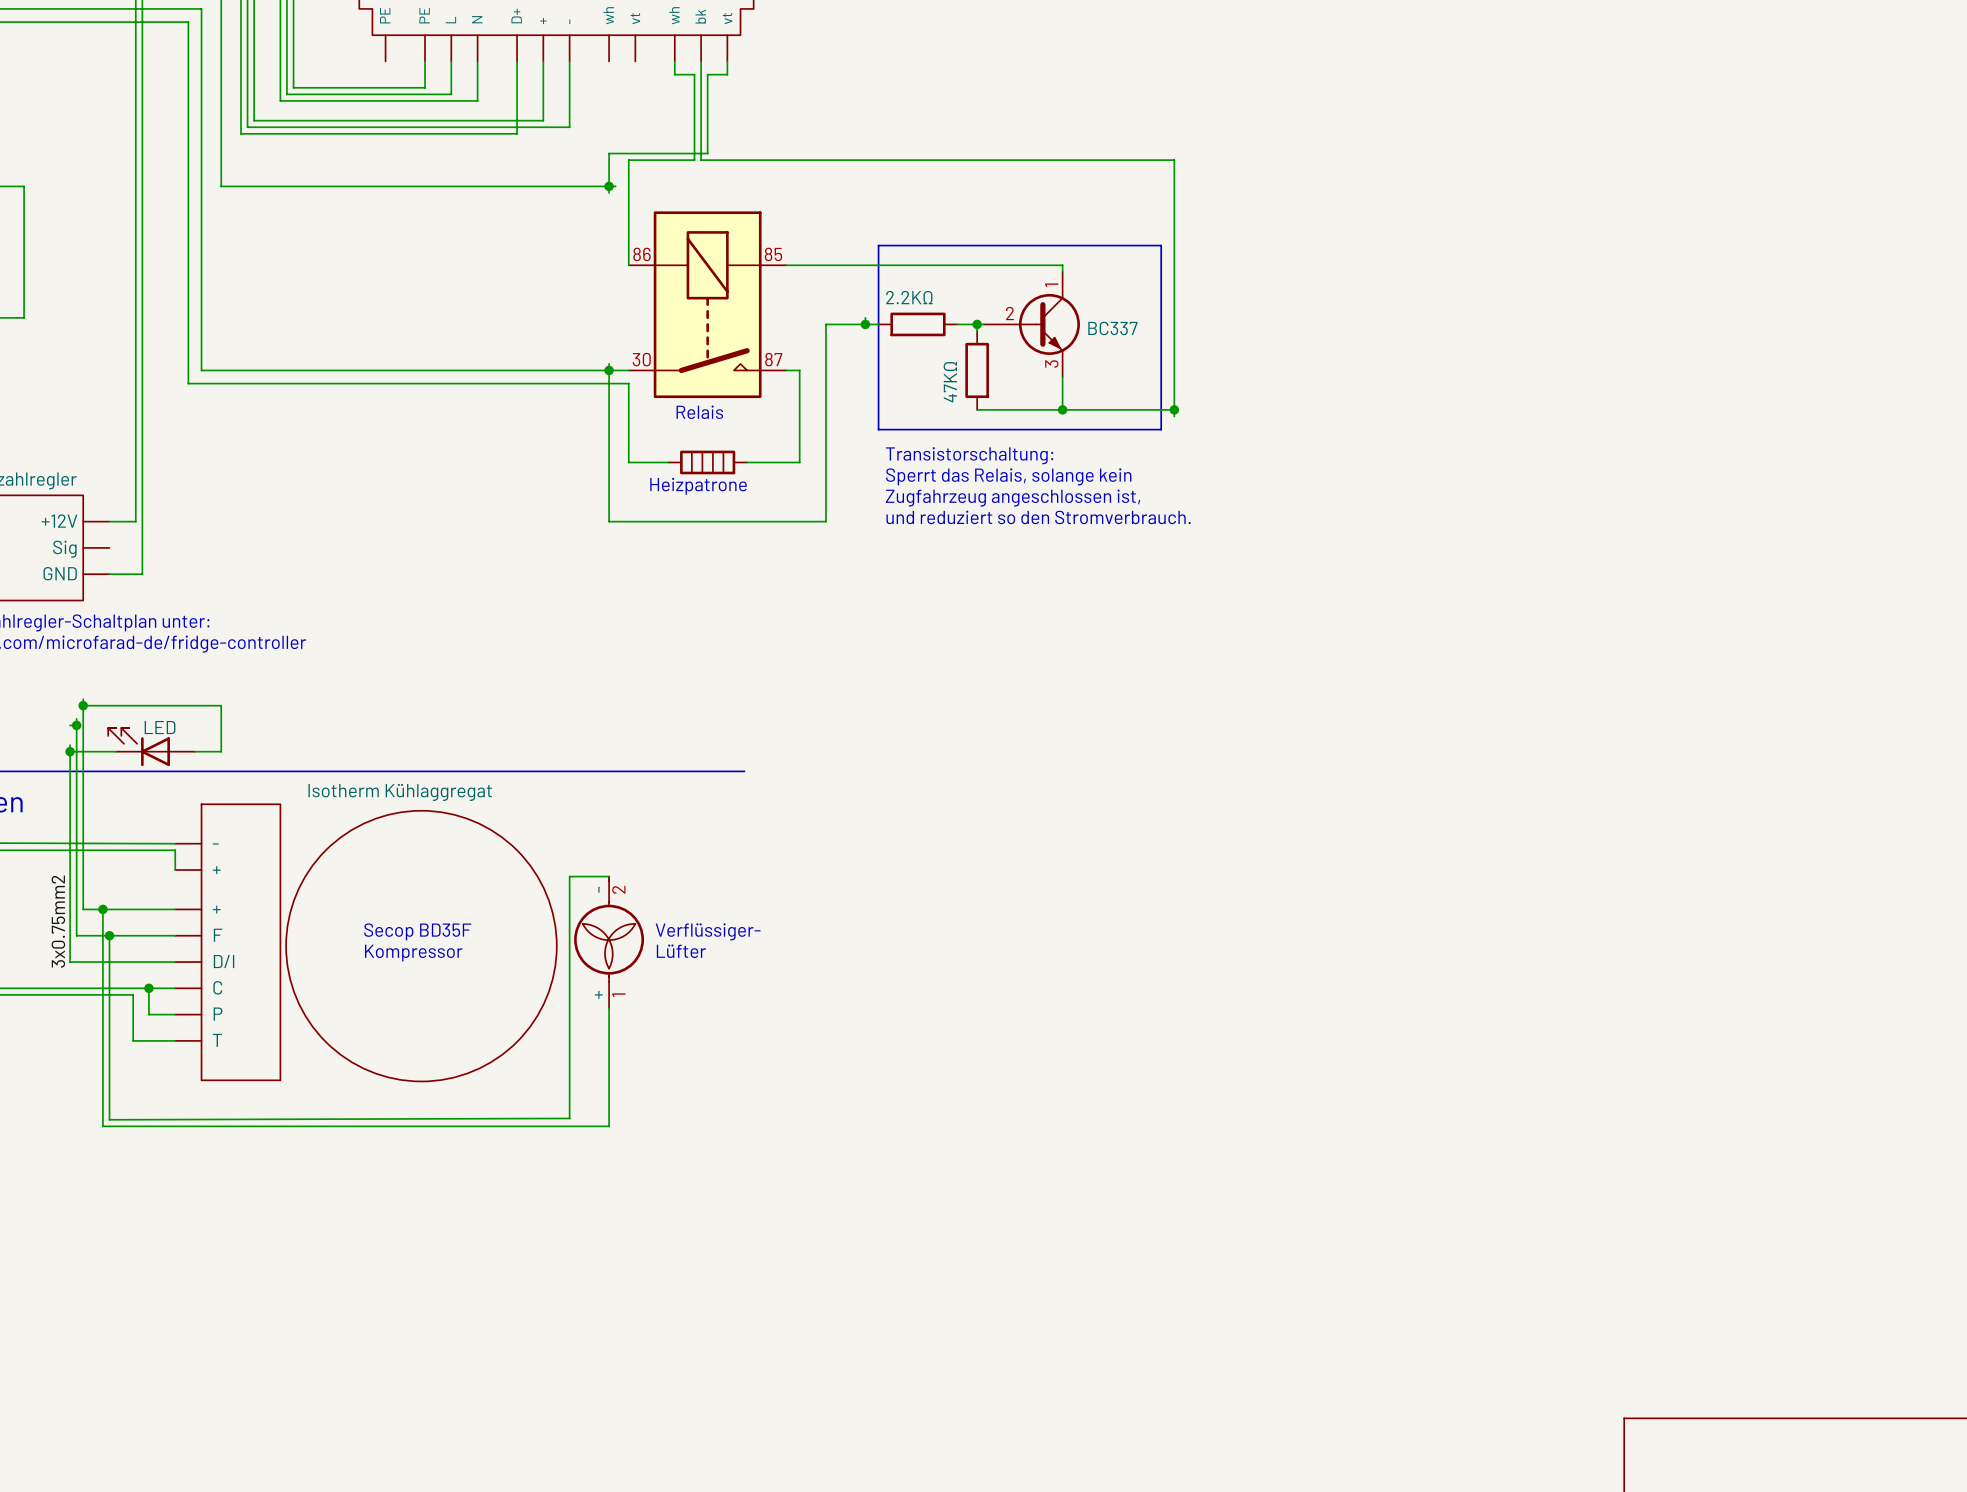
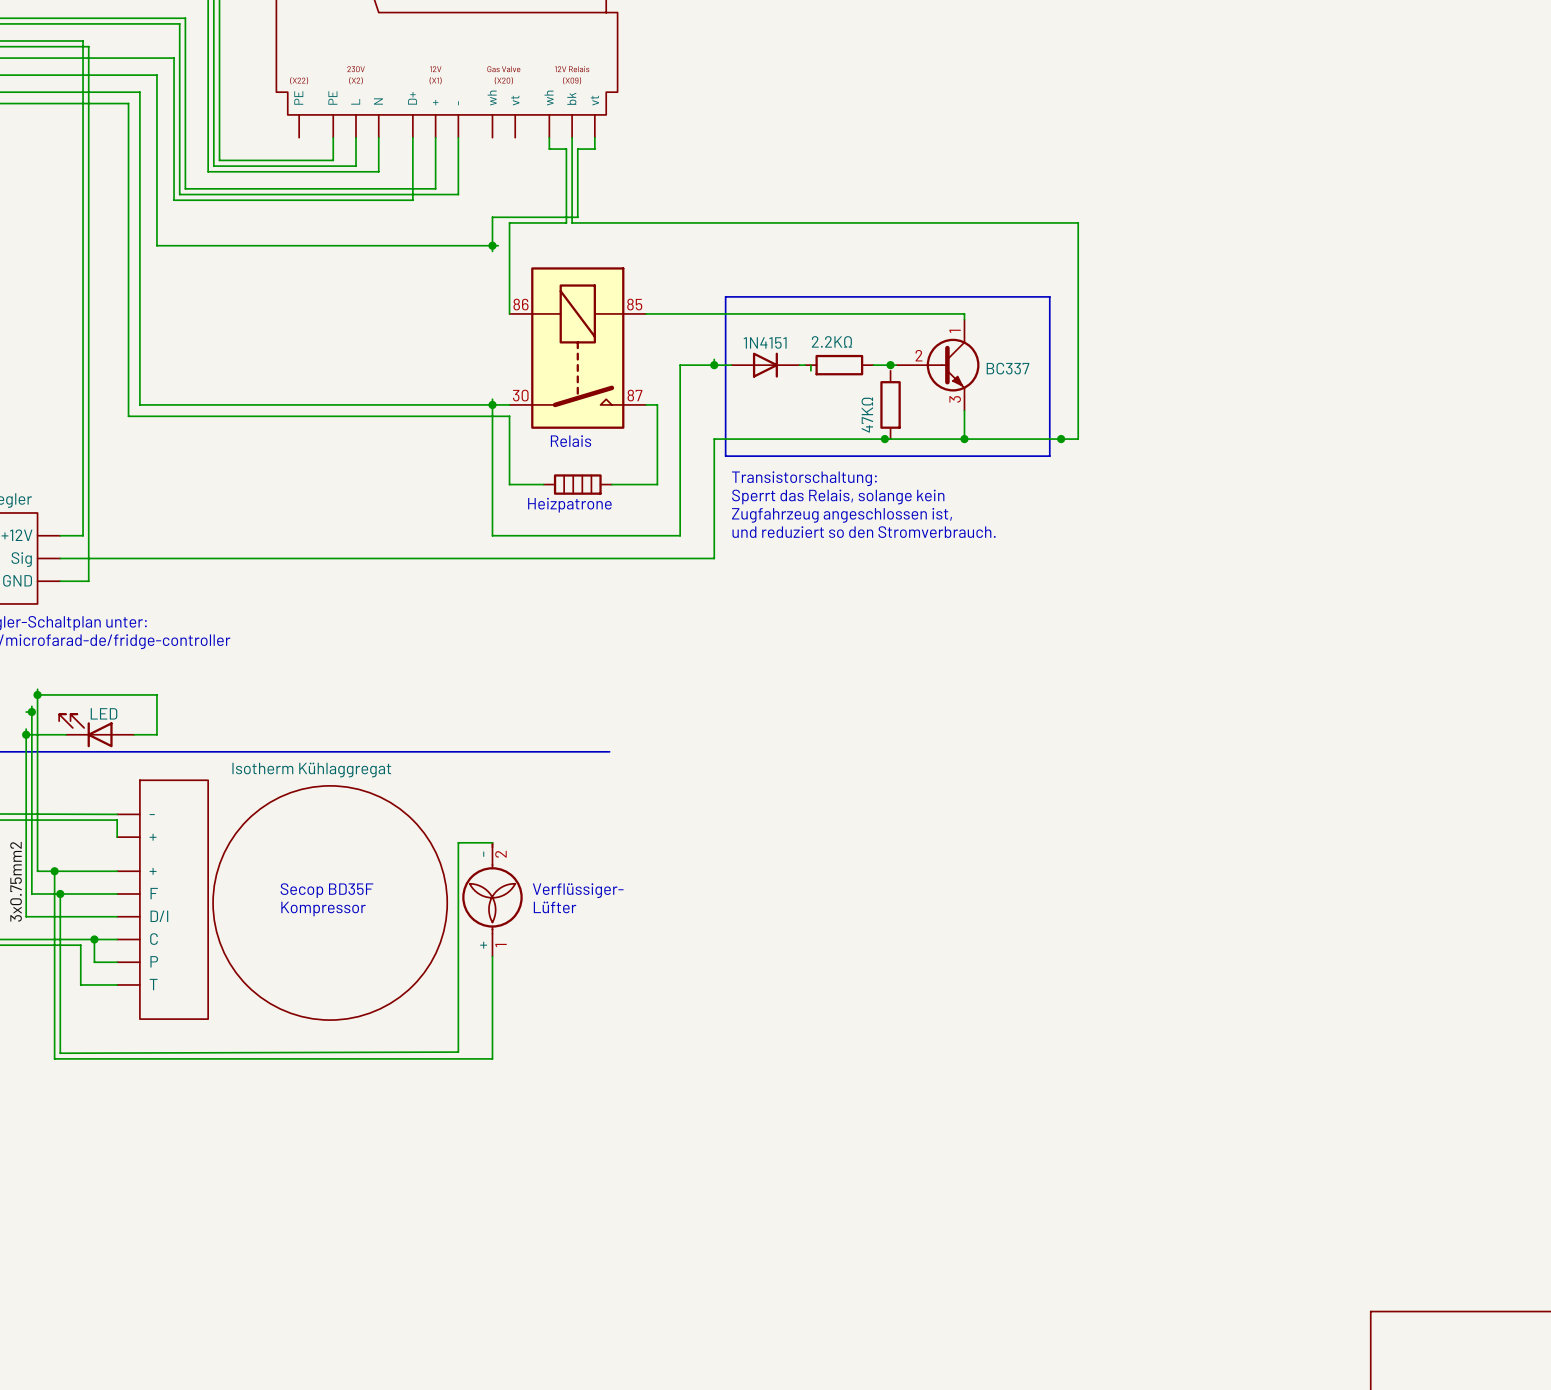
wire: (1174, 160) (1174, 416) -> (981, 222) (1078, 222) (1078, 439) (981, 439)
line: (1161, 245) (1161, 429) -> (970, 296) (1049, 296) (1049, 456) (970, 456)
wire: (1062, 265) (1062, 271) -> (884, 313) (964, 313) (964, 319)
part value: 2.2KΩ (909, 297) -> 1N4151 (765, 342)
part symbol: [878, 312, 958, 337] -> [731, 352, 800, 378]
junction: (977, 324) -> none
part: none -> 2.2KΩ (839, 365)
part position: (1031, 324) -> (937, 365)
wire: none -> (873, 365) (896, 365)
junction: none -> (890, 365)
part position: (977, 370) -> (890, 404)
wire: (1062, 377) (1062, 409) -> (964, 410) (964, 439)
wire: none -> (810, 439) (714, 439) (714, 558) (60, 558)
junction position: (1174, 409) -> (964, 439)
junction: none -> (1061, 439)

